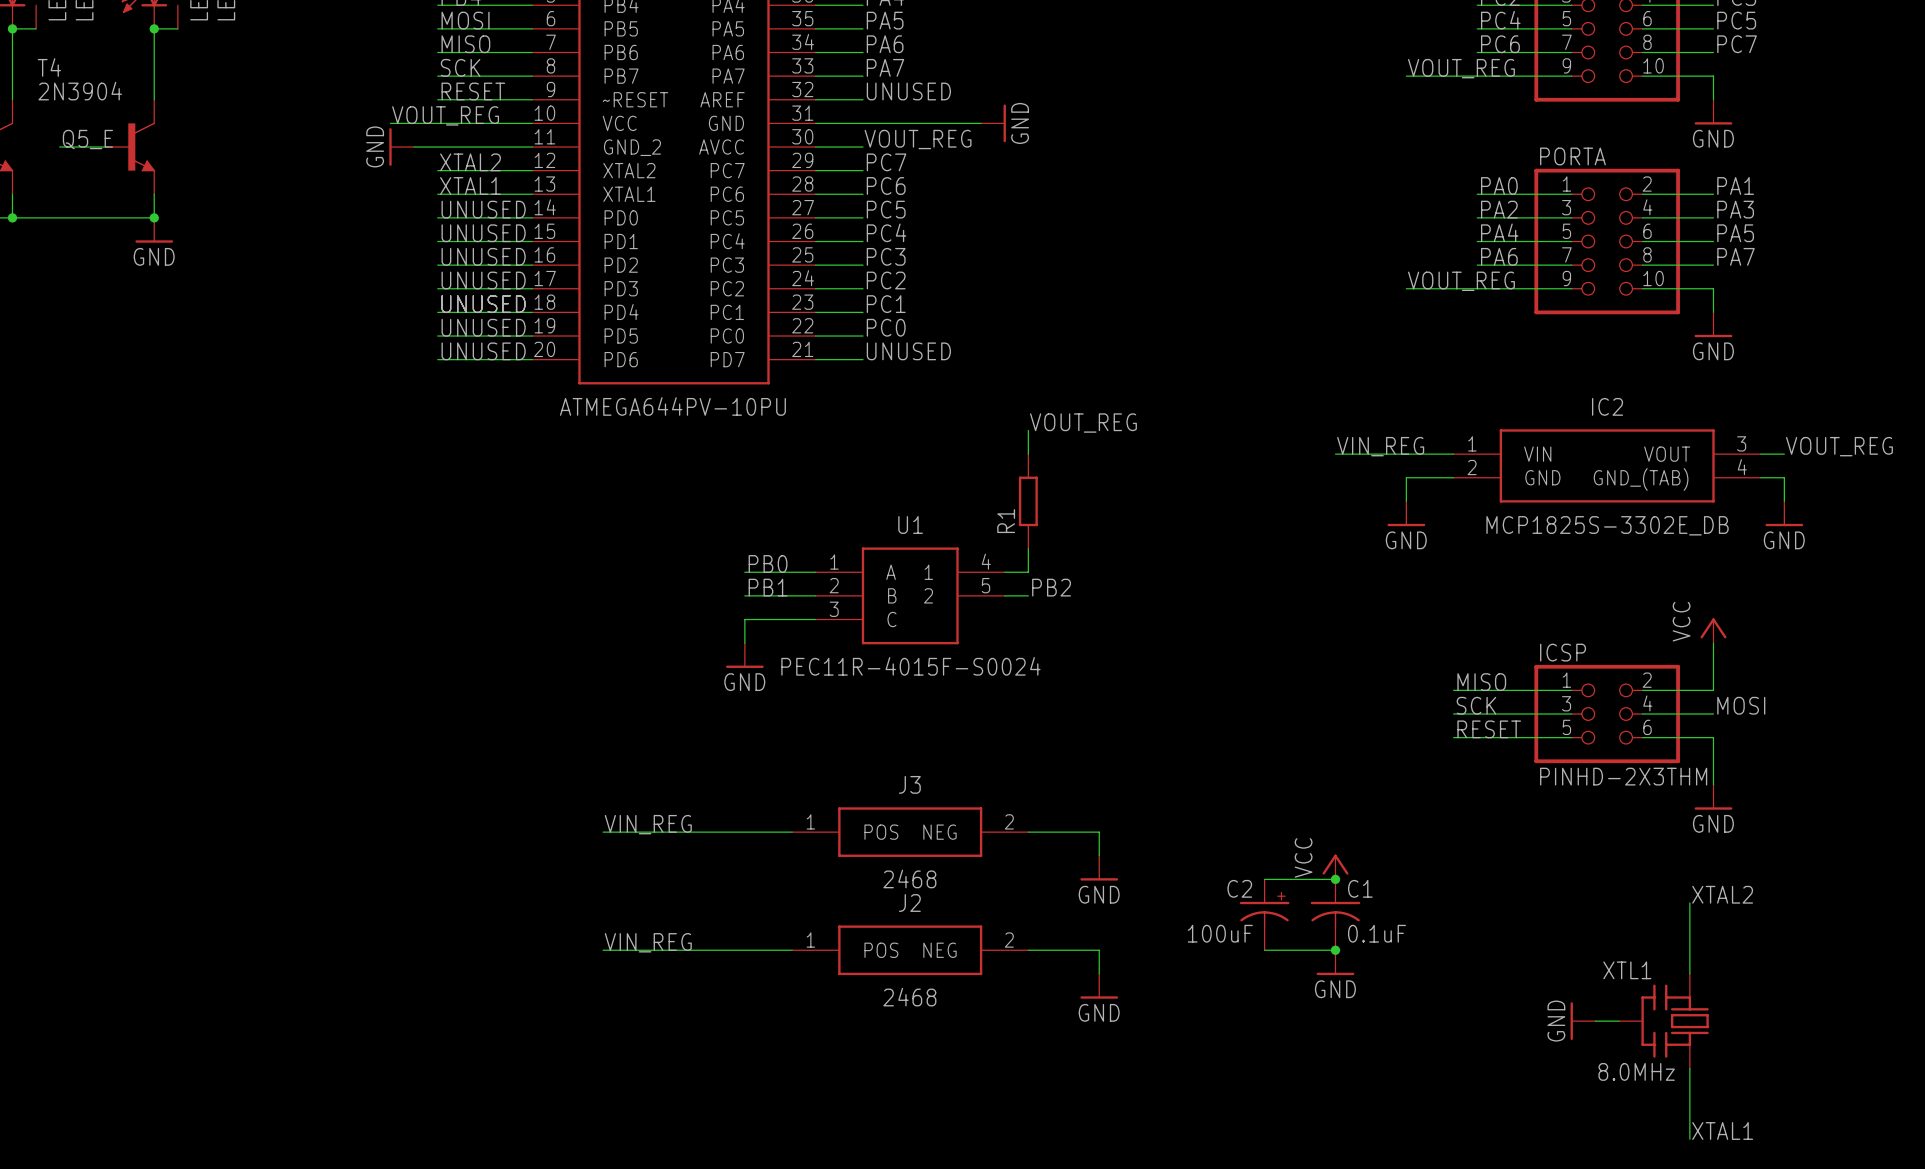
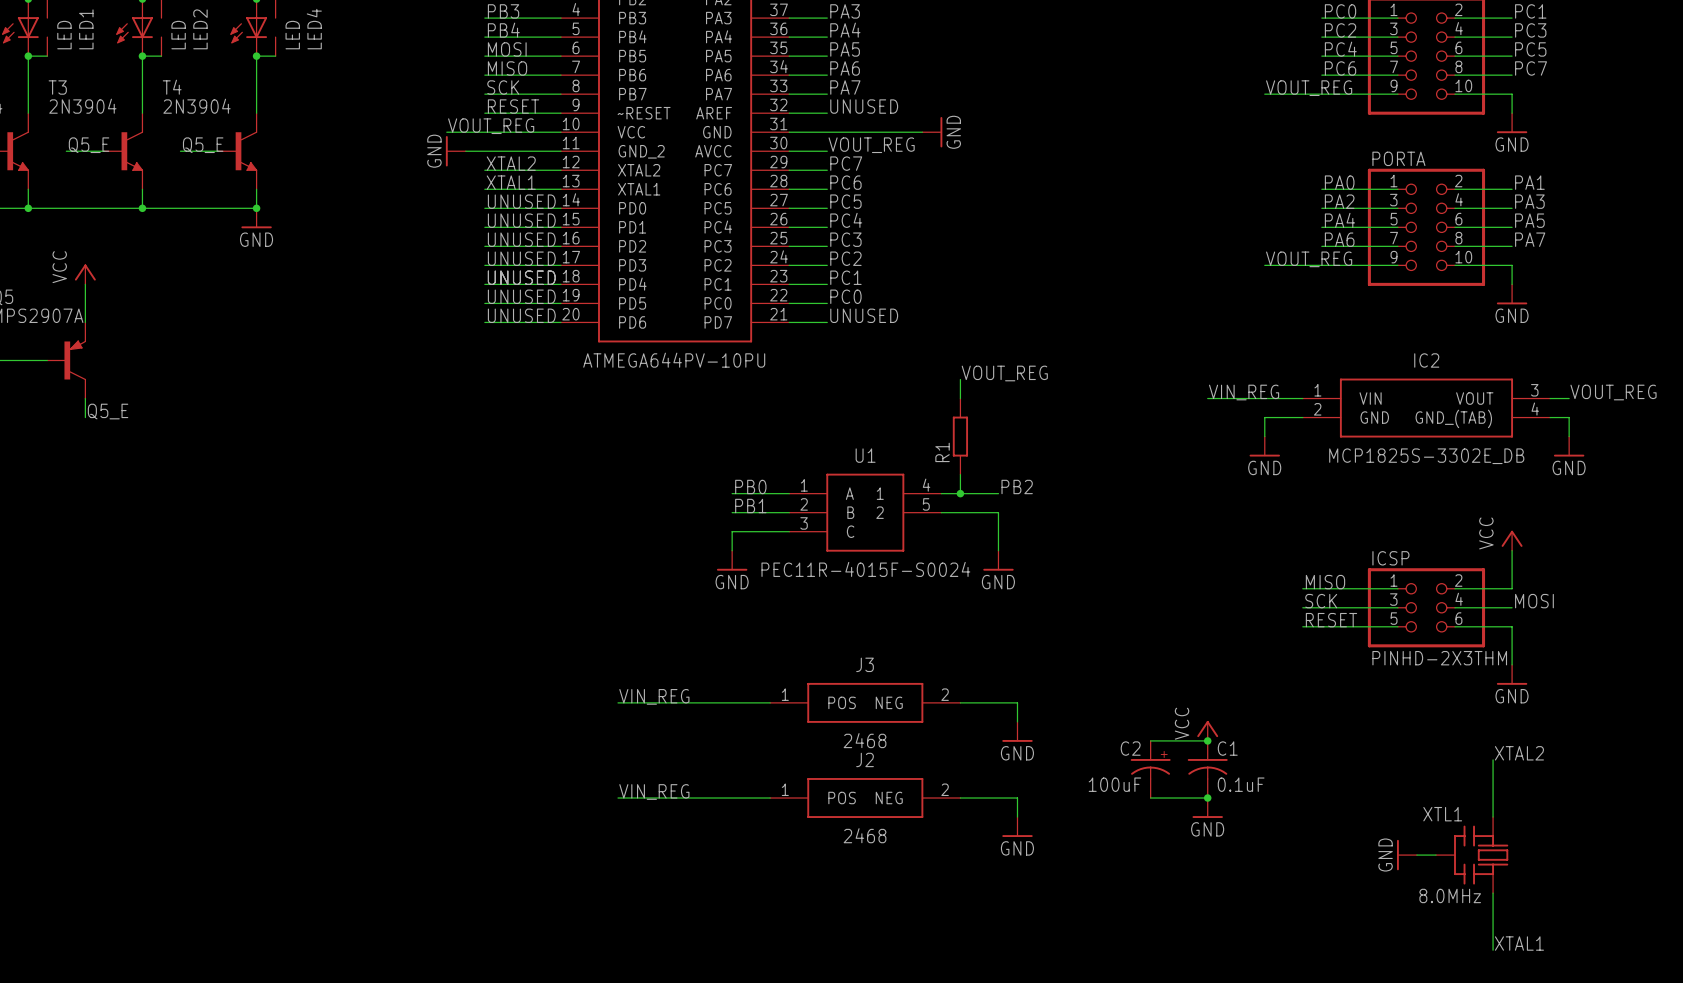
wire: none -> (960, 493) (998, 493)
junction: none -> (960, 493)
text position: PB2 (1051, 587) -> PB2 (1017, 486)
wire: none -> (960, 512) (998, 512) (998, 550)
power symbol: none -> GND (998, 560)

